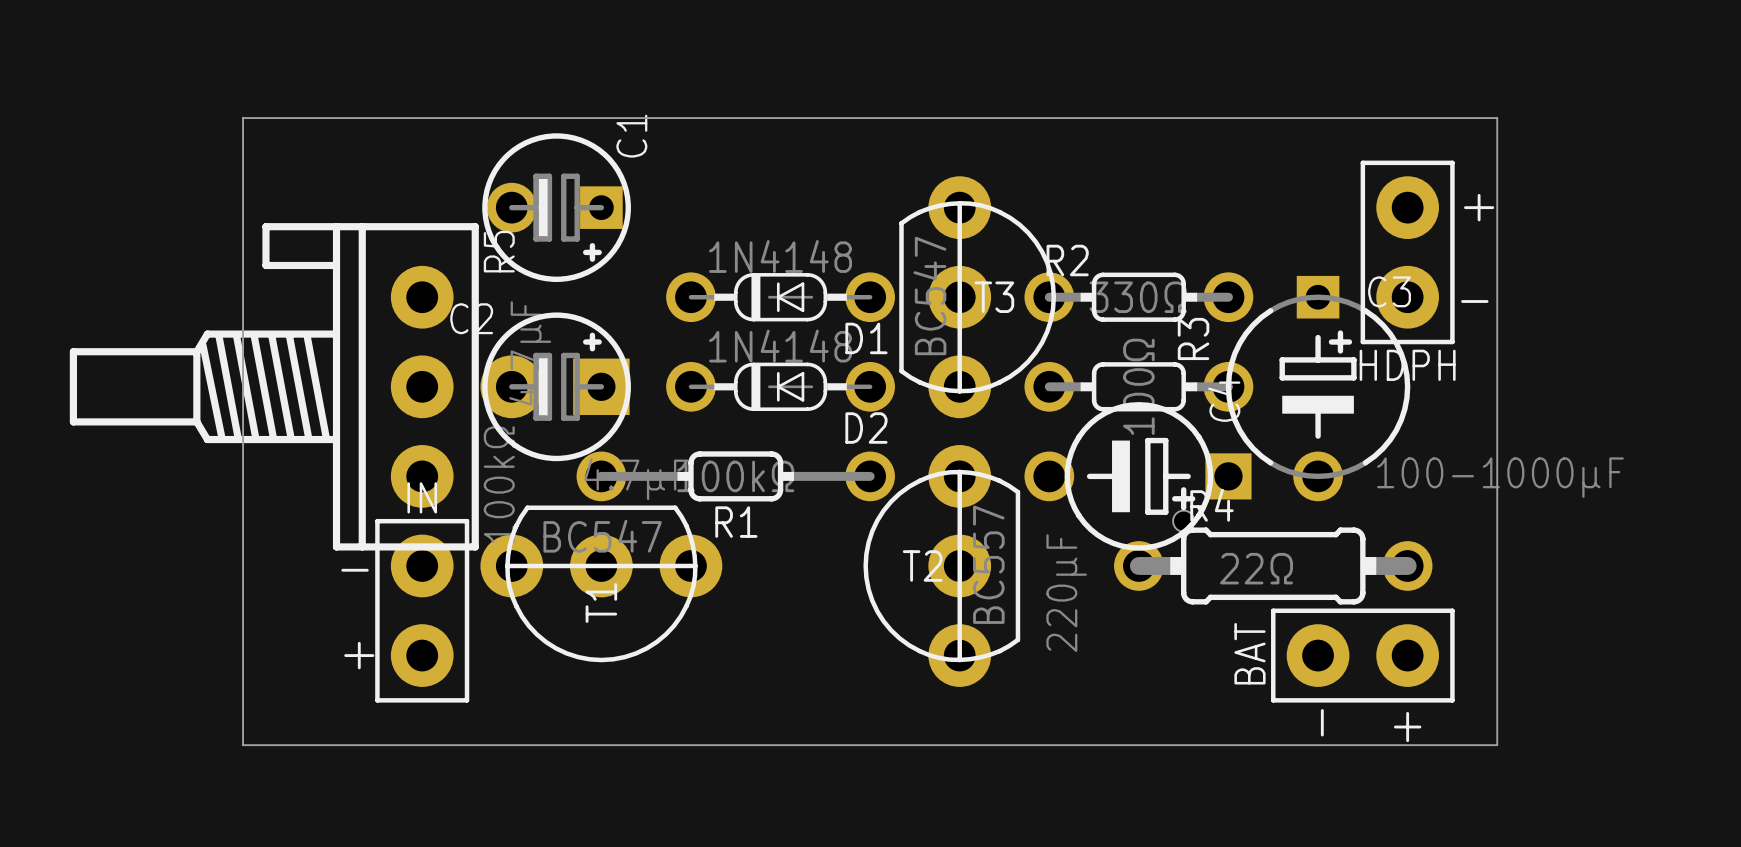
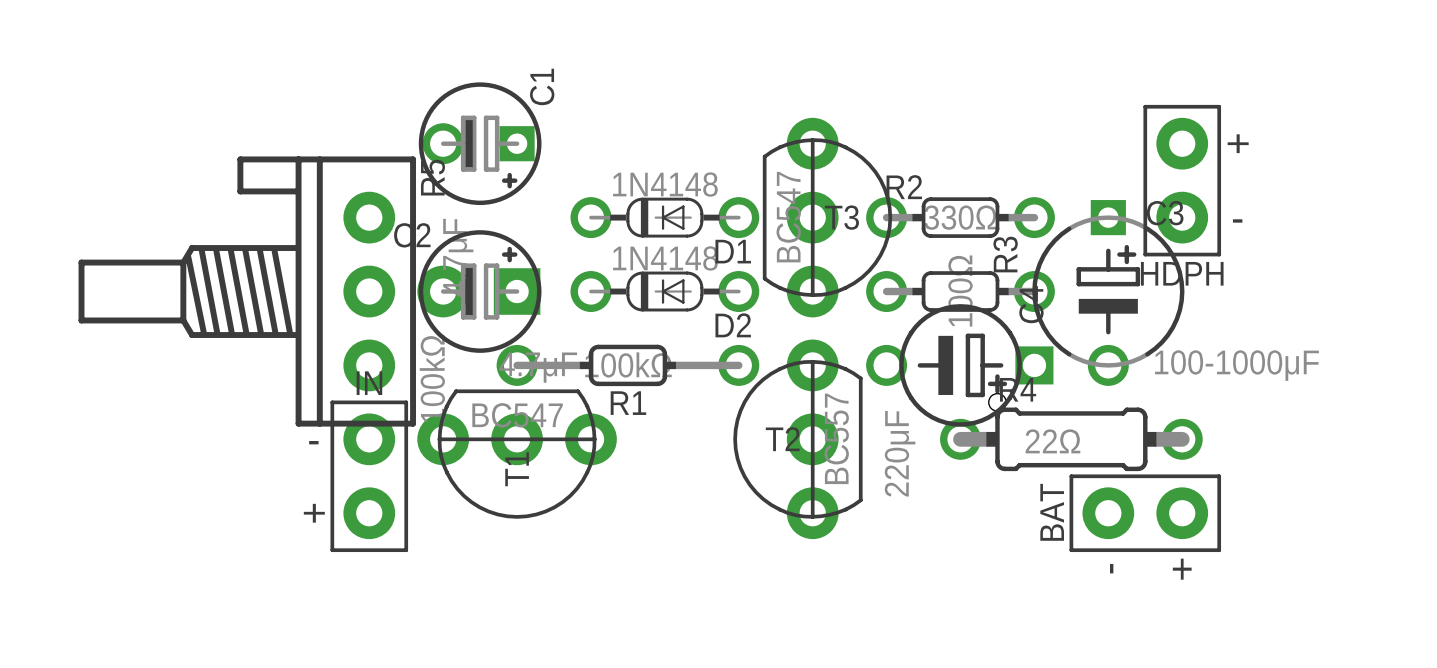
board edge: (243, 118) (1497, 118) (1497, 745) (243, 745) (243, 118) -> none

